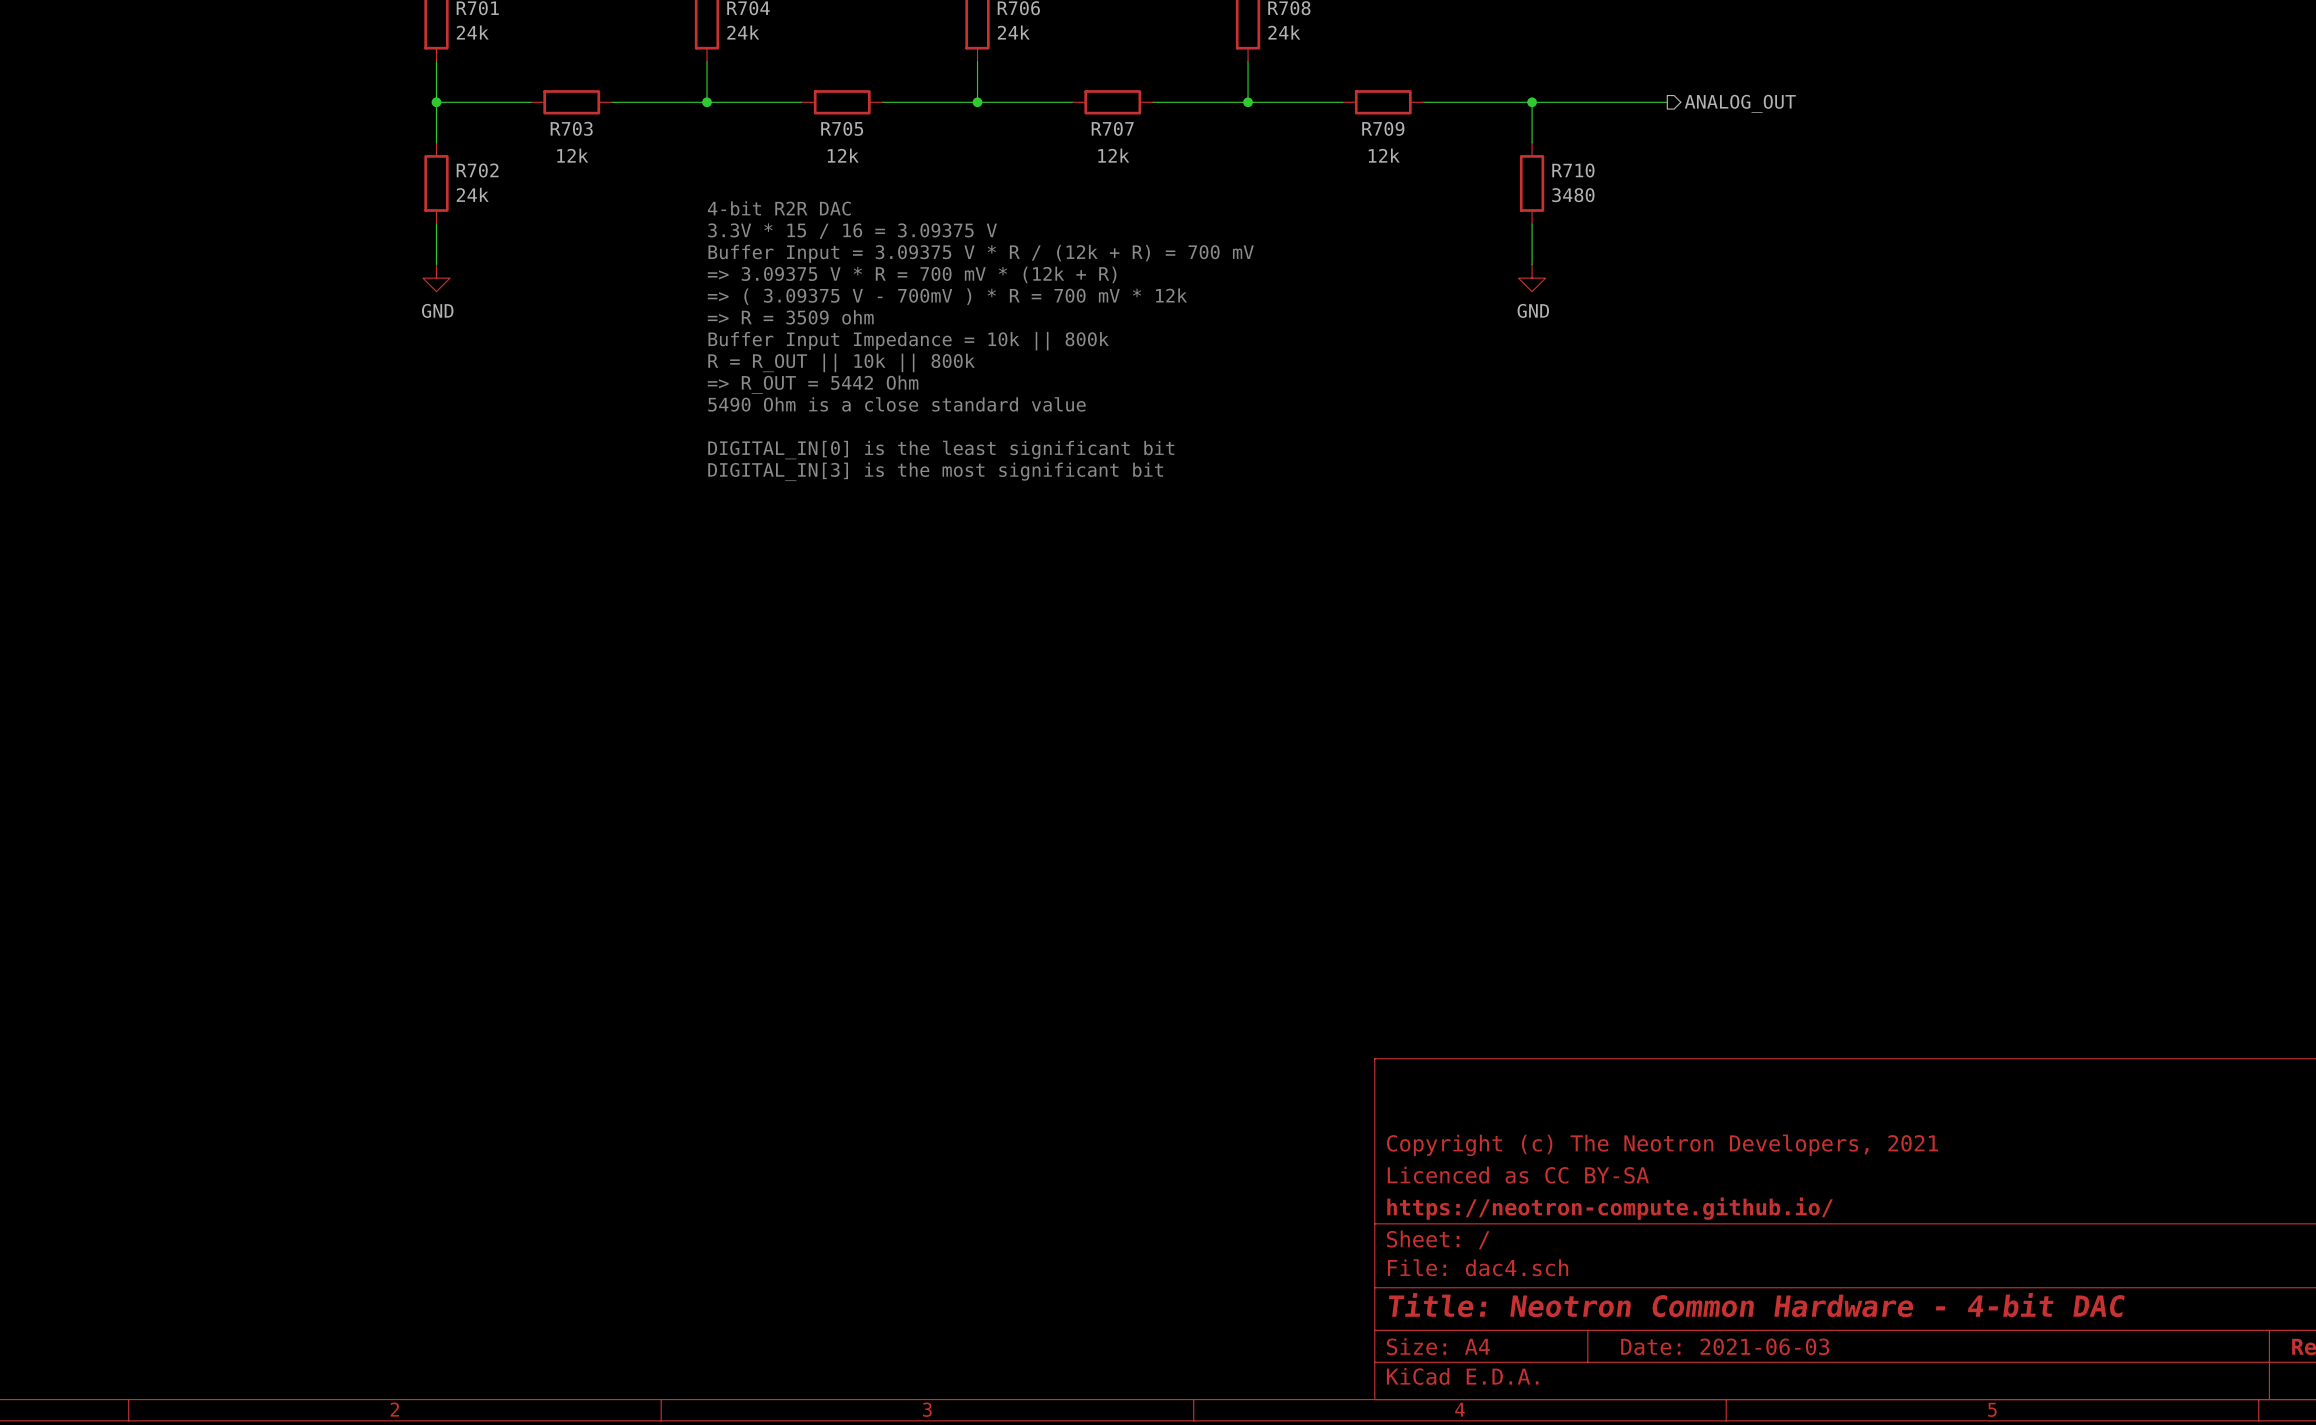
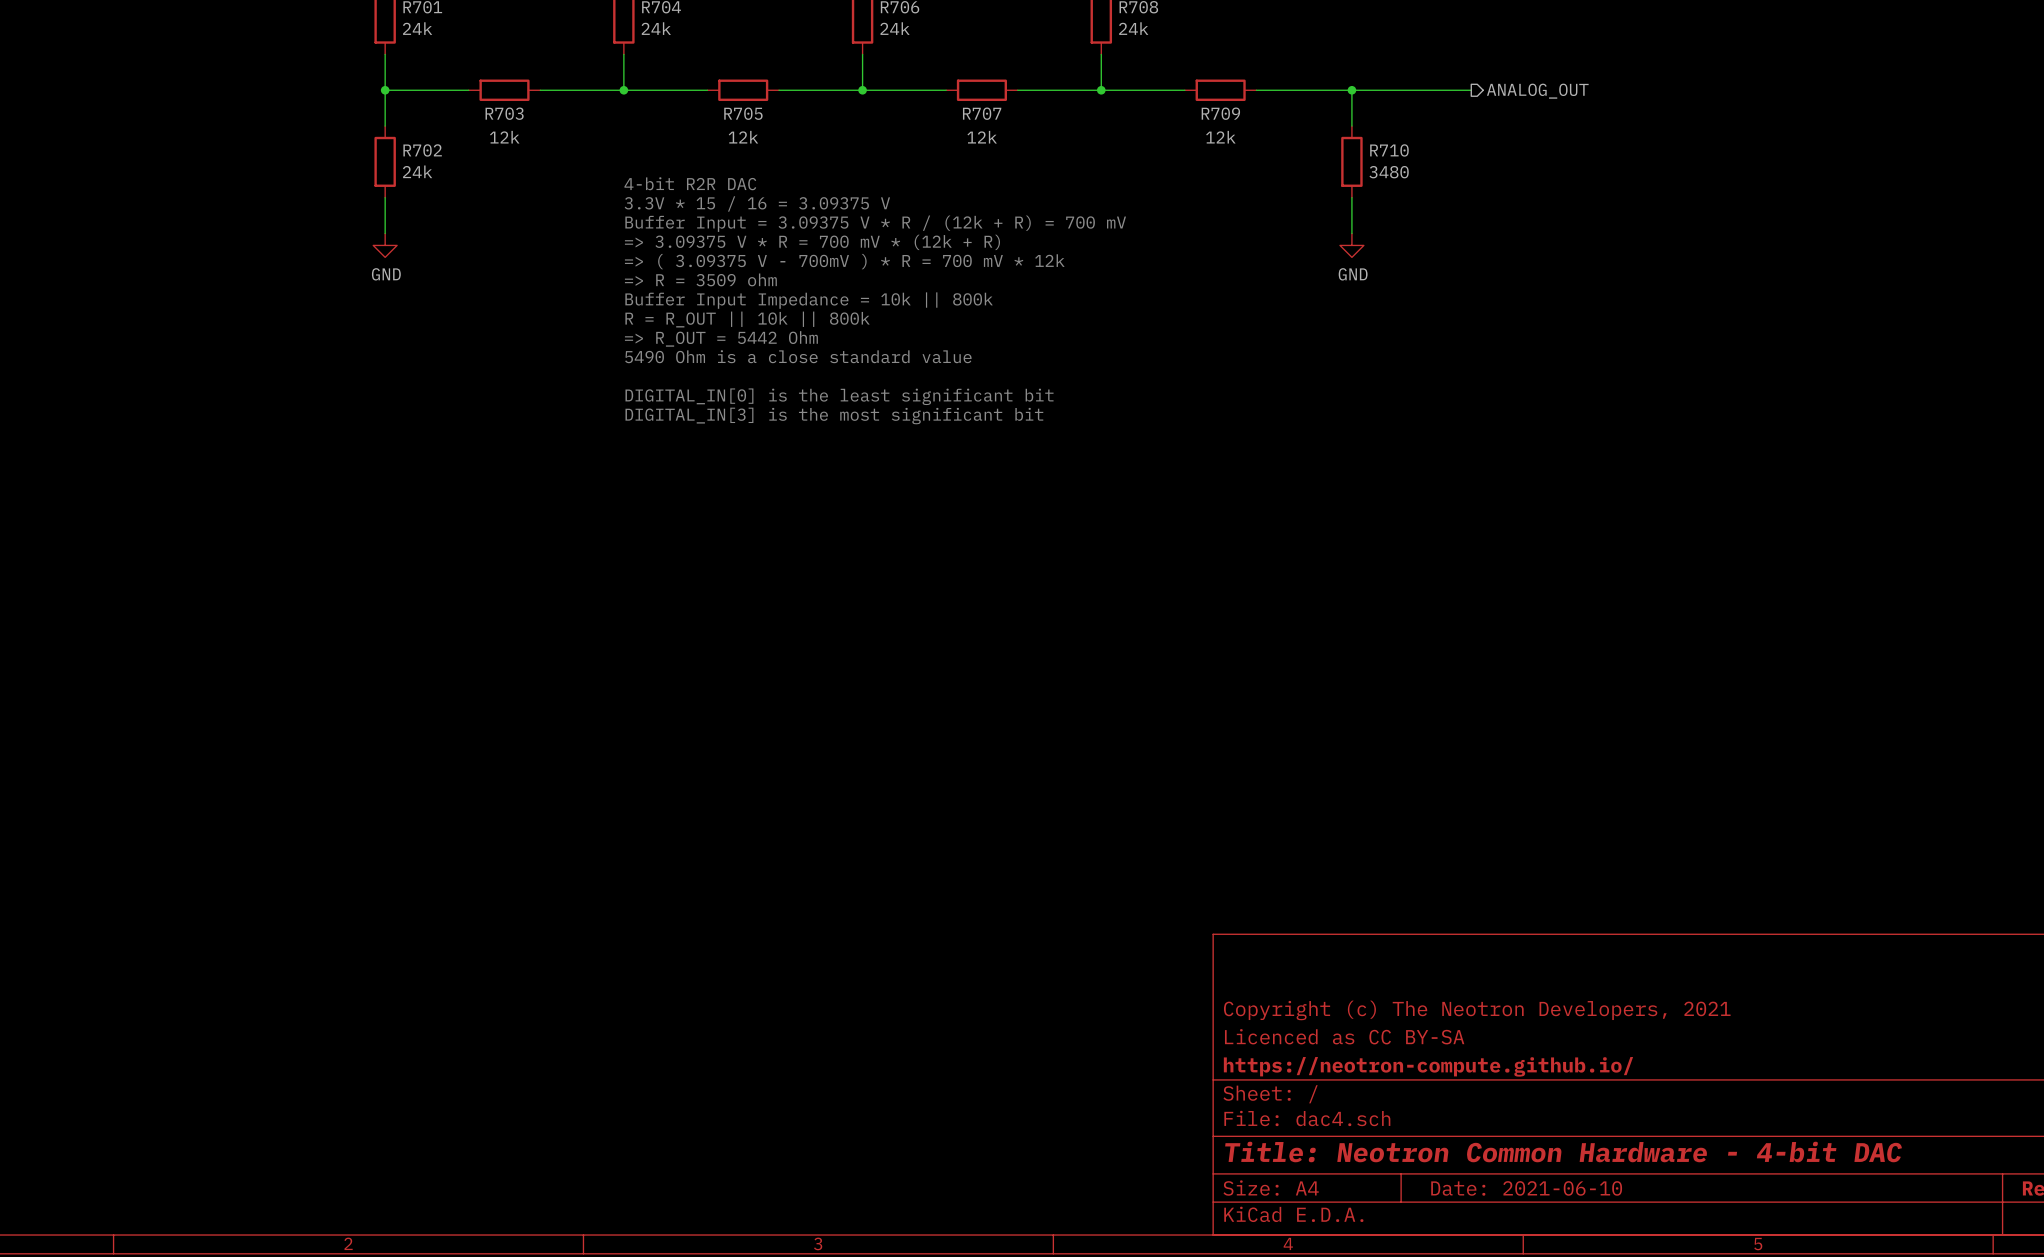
title block: Date: 2021-06-03 (1725, 1346) -> Date: 2021-06-10 (1526, 1188)

